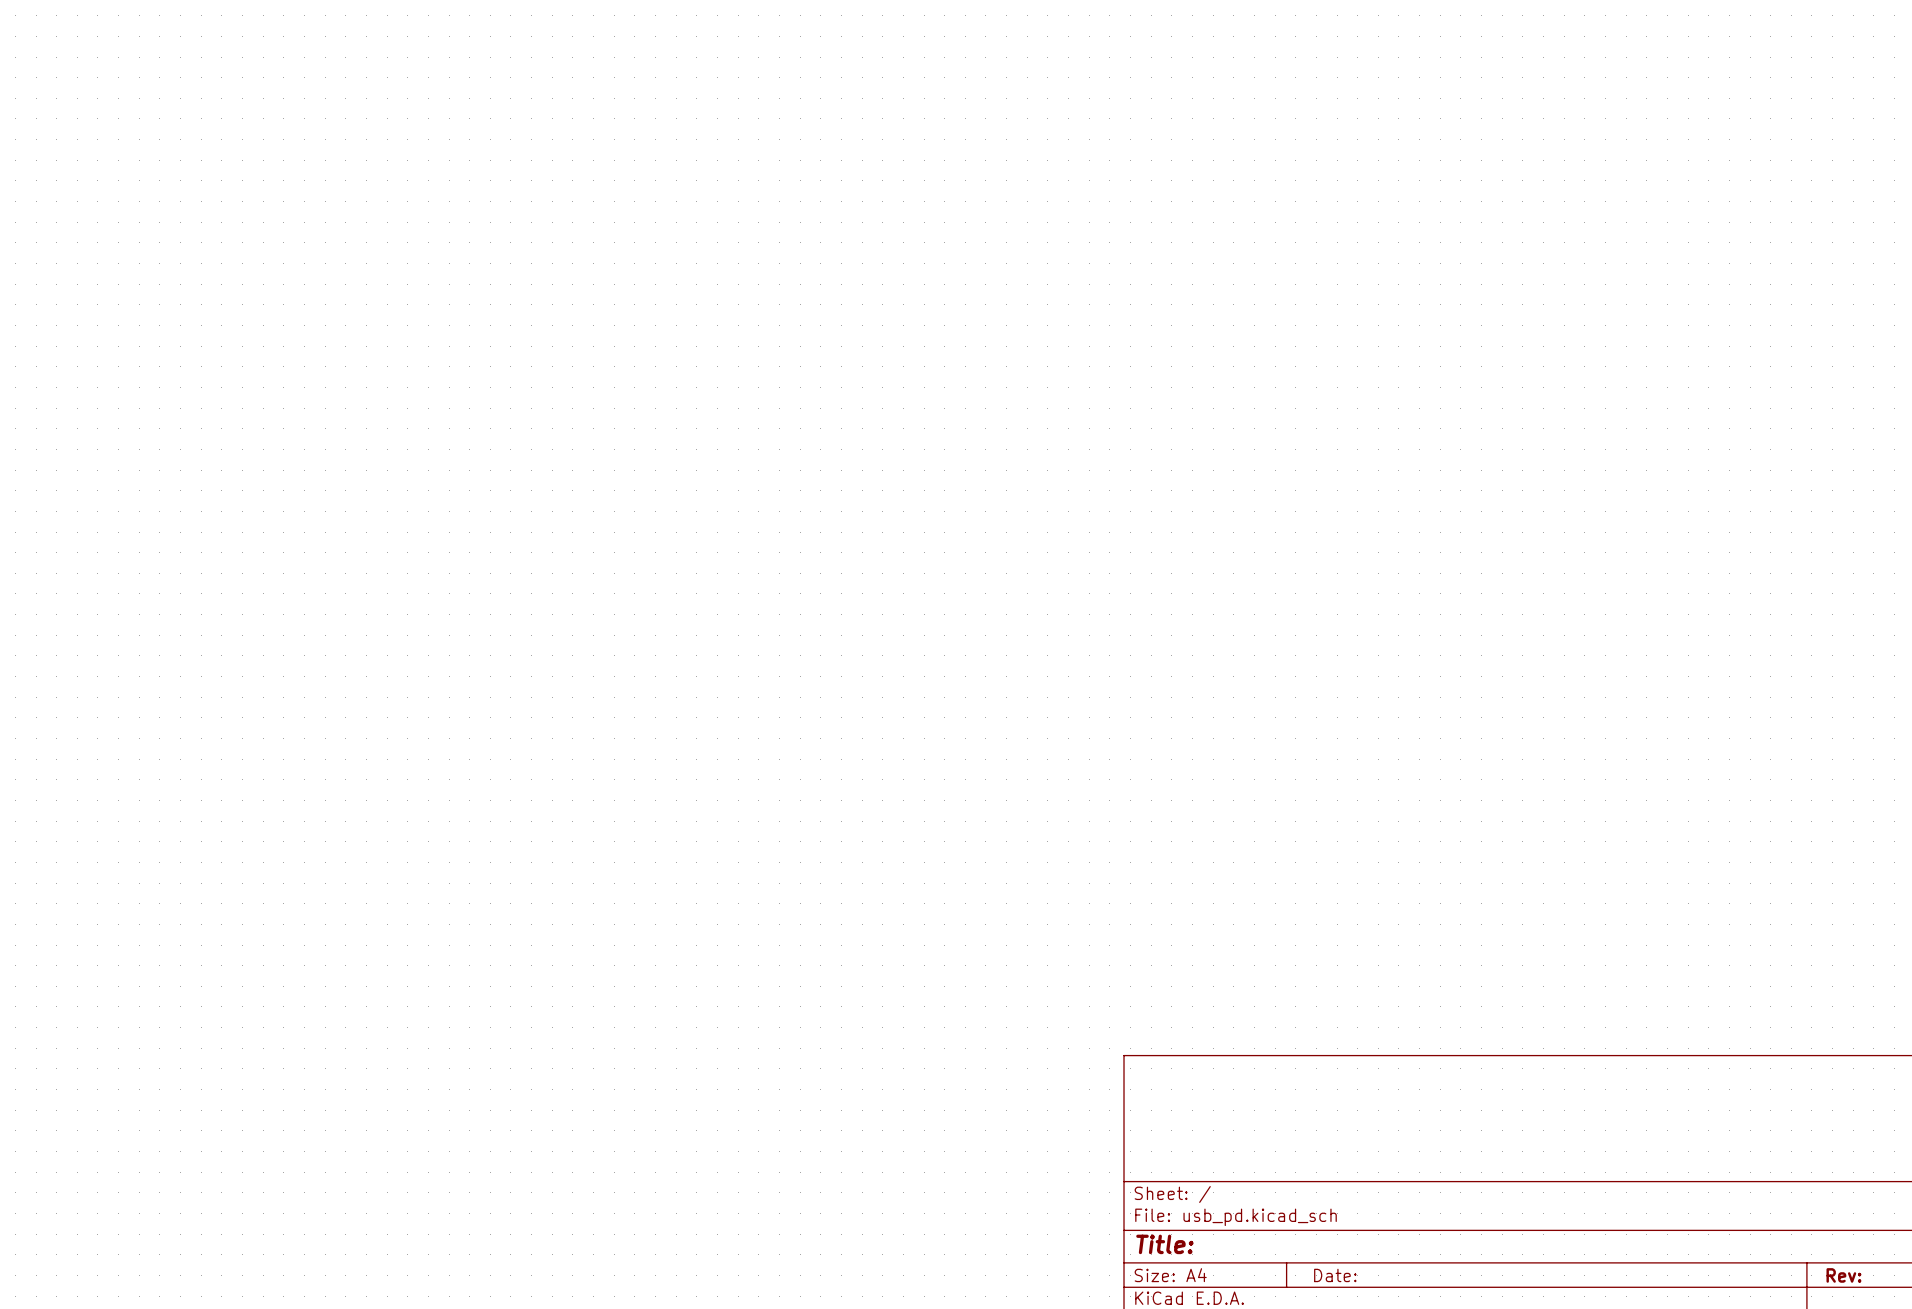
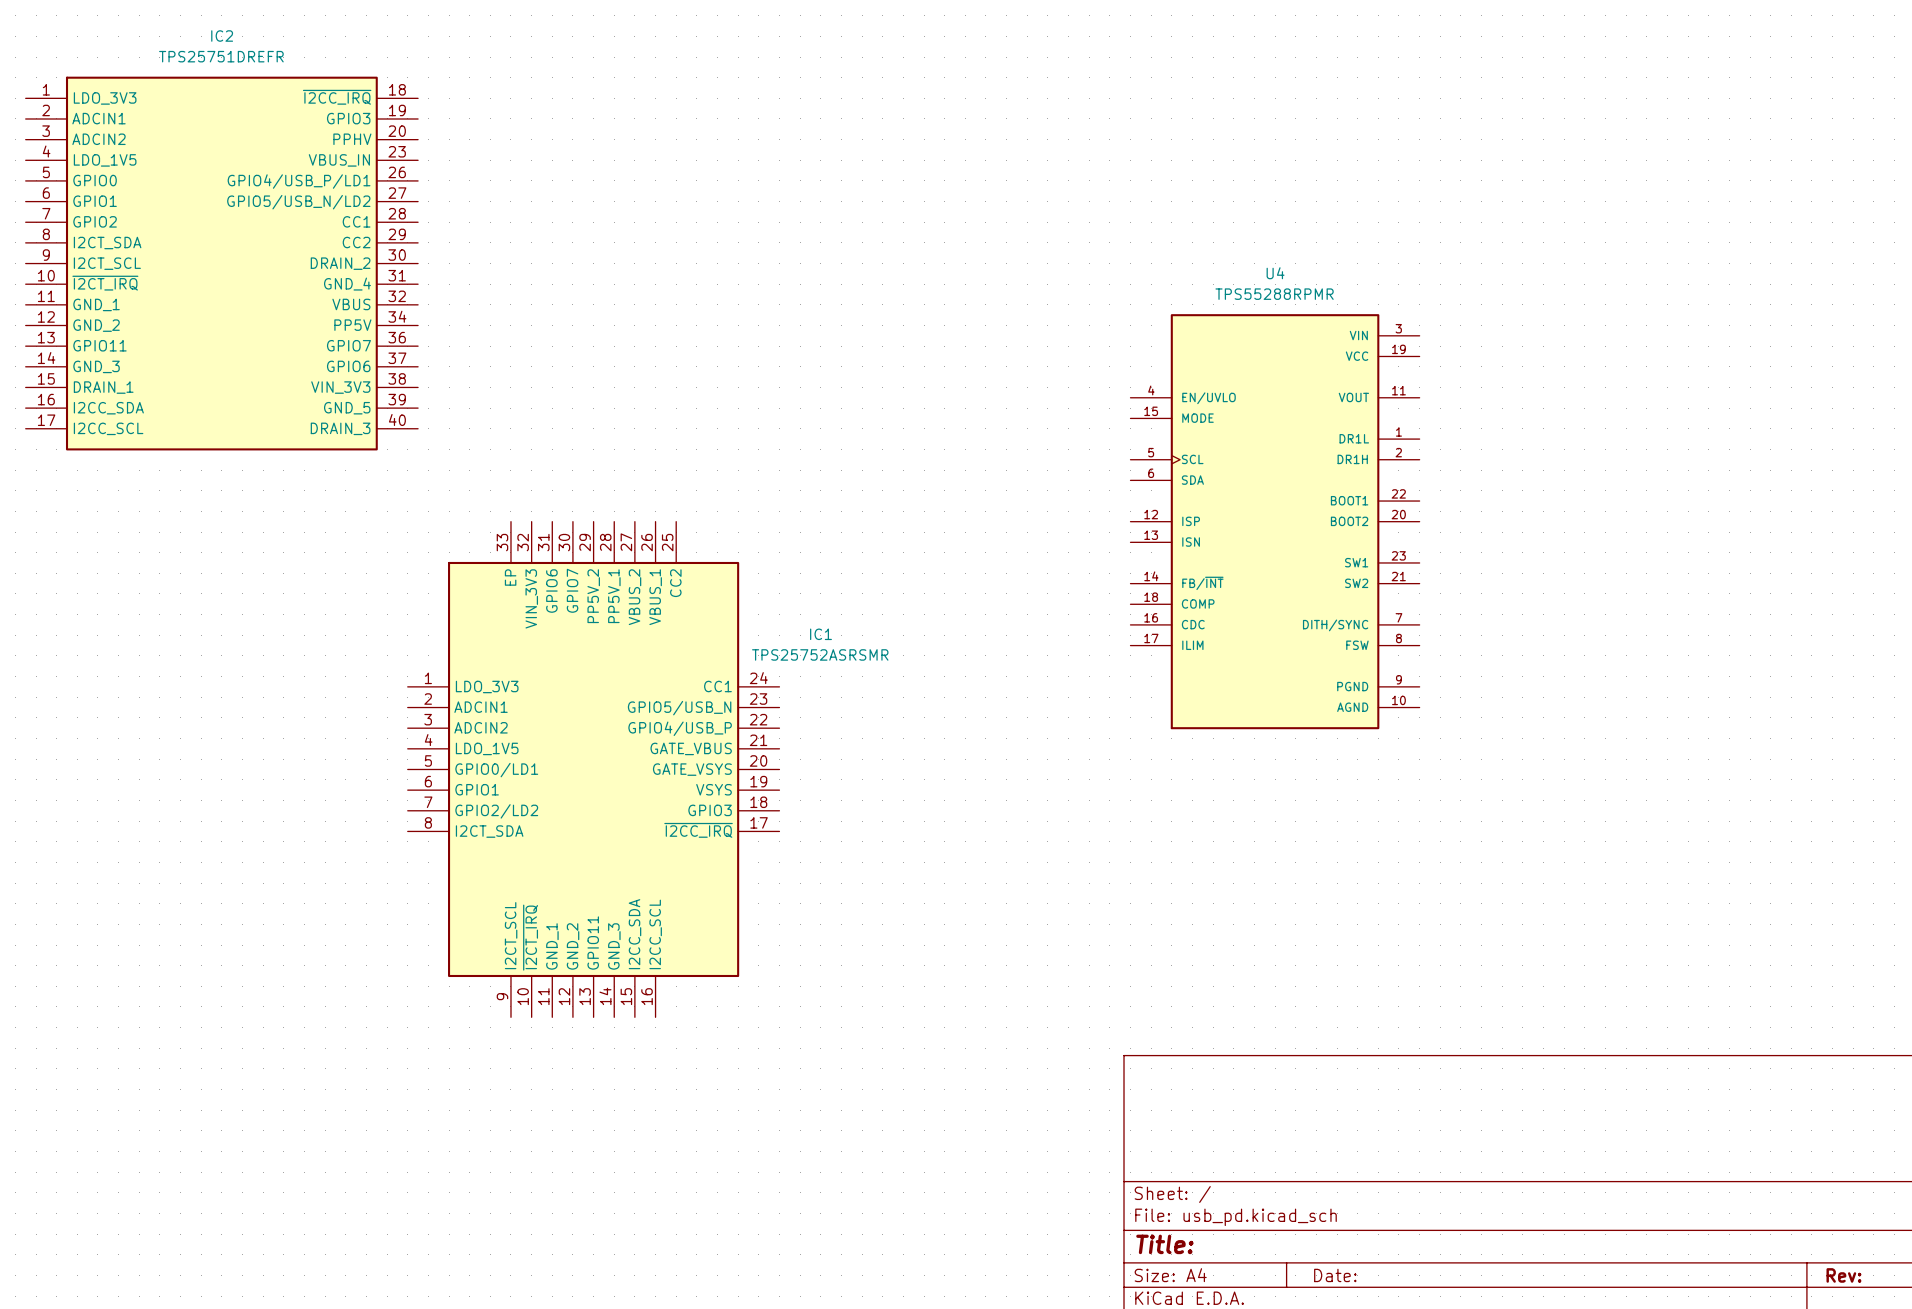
IC2: none -> TPS25751DREFR (221, 263)
U4: none -> TPS55288RPMR (1275, 521)
IC1: none -> TPS25752ASRSMR (593, 769)

